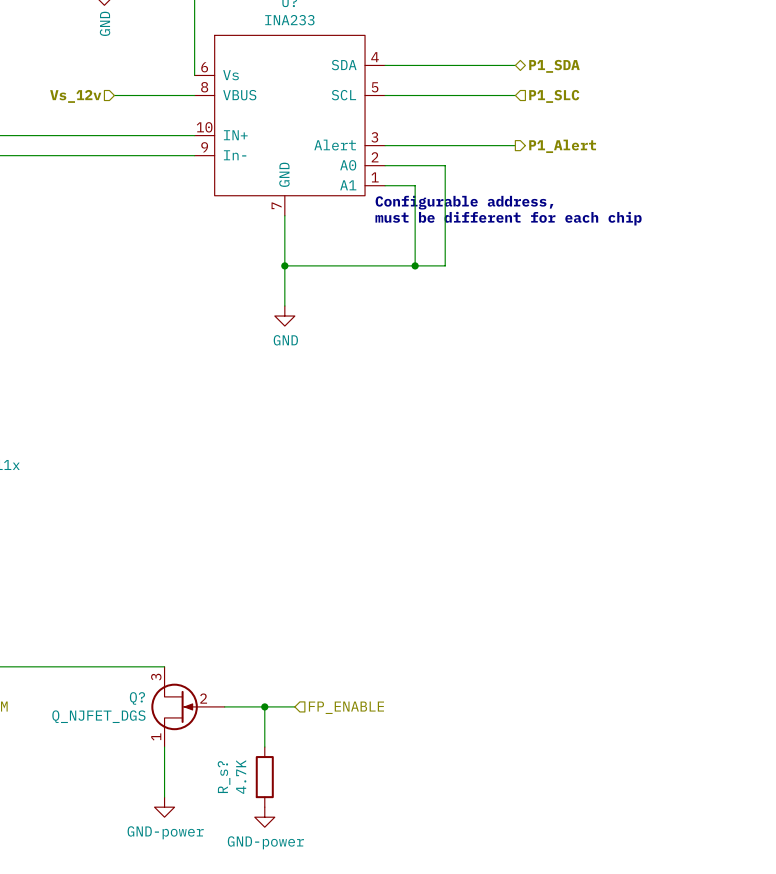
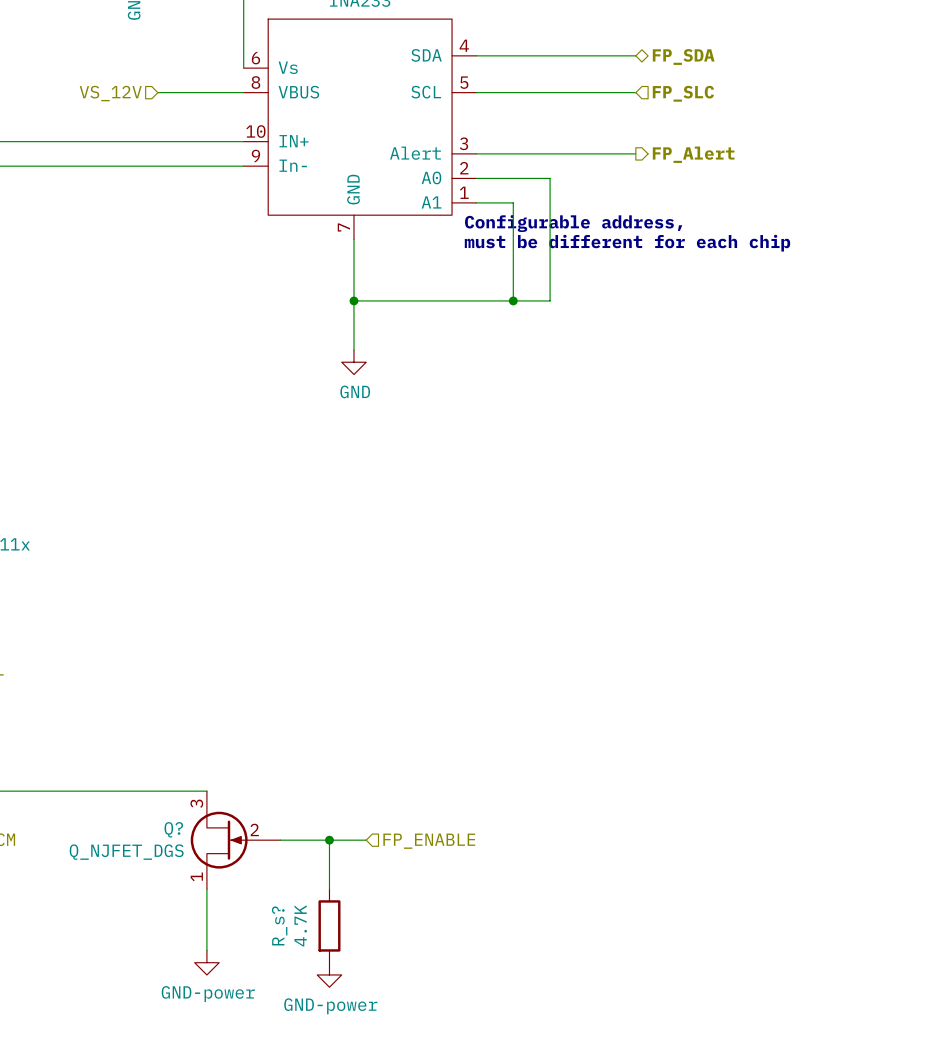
hierarchical label: P1_SDA (554, 66) -> FP_SDA (683, 56)
wire: (114, 95) (124, 95) -> none
hierarchical label: Vs_12v (75, 96) -> VS_12V (110, 93)
hierarchical label: P1_SLC (554, 96) -> FP_SLC (683, 93)
hierarchical label: P1_Alert (562, 146) -> FP_Alert (693, 154)

